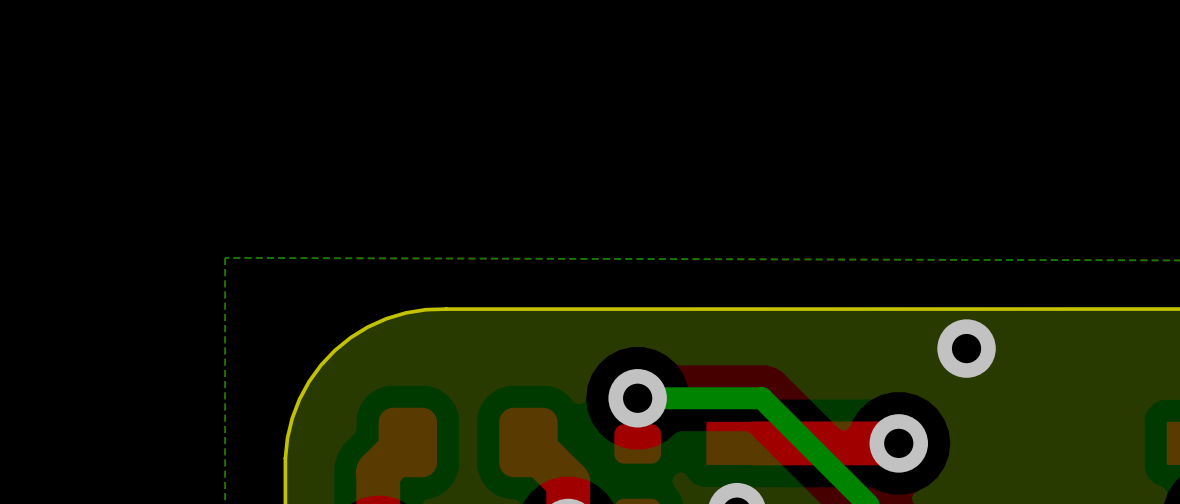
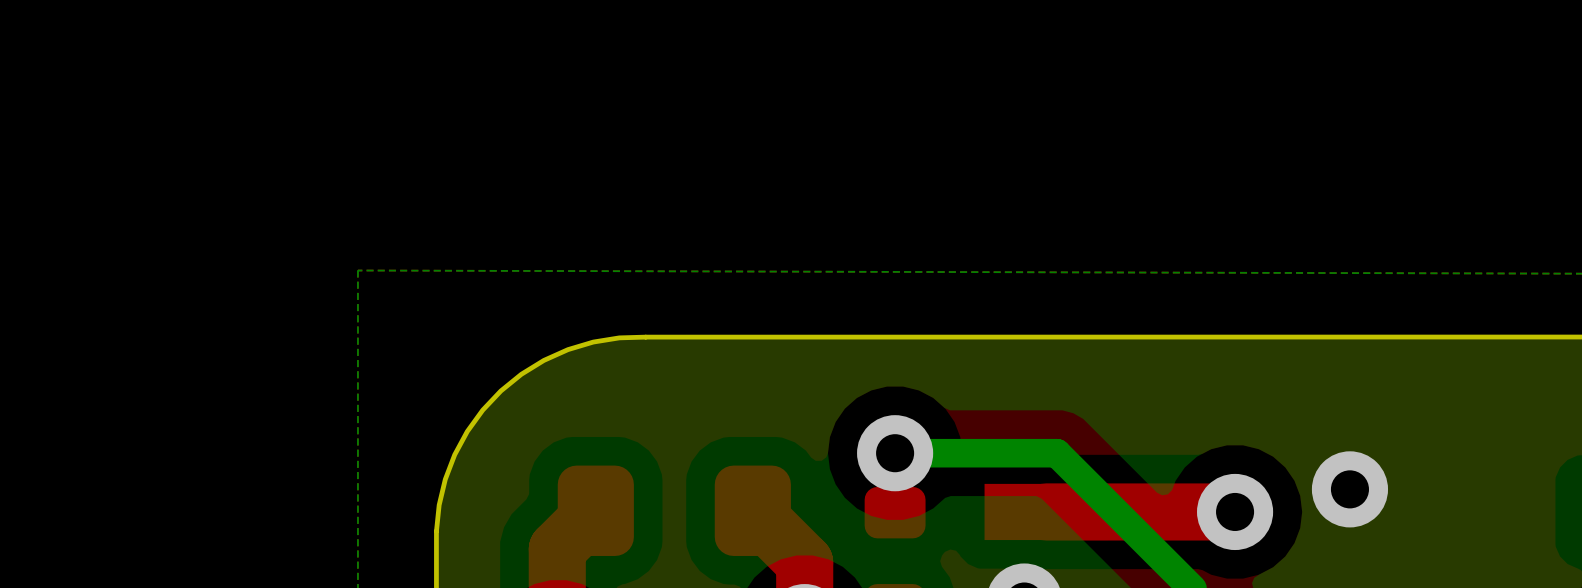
via: (966, 348) -> none
via: none -> (1349, 489)

